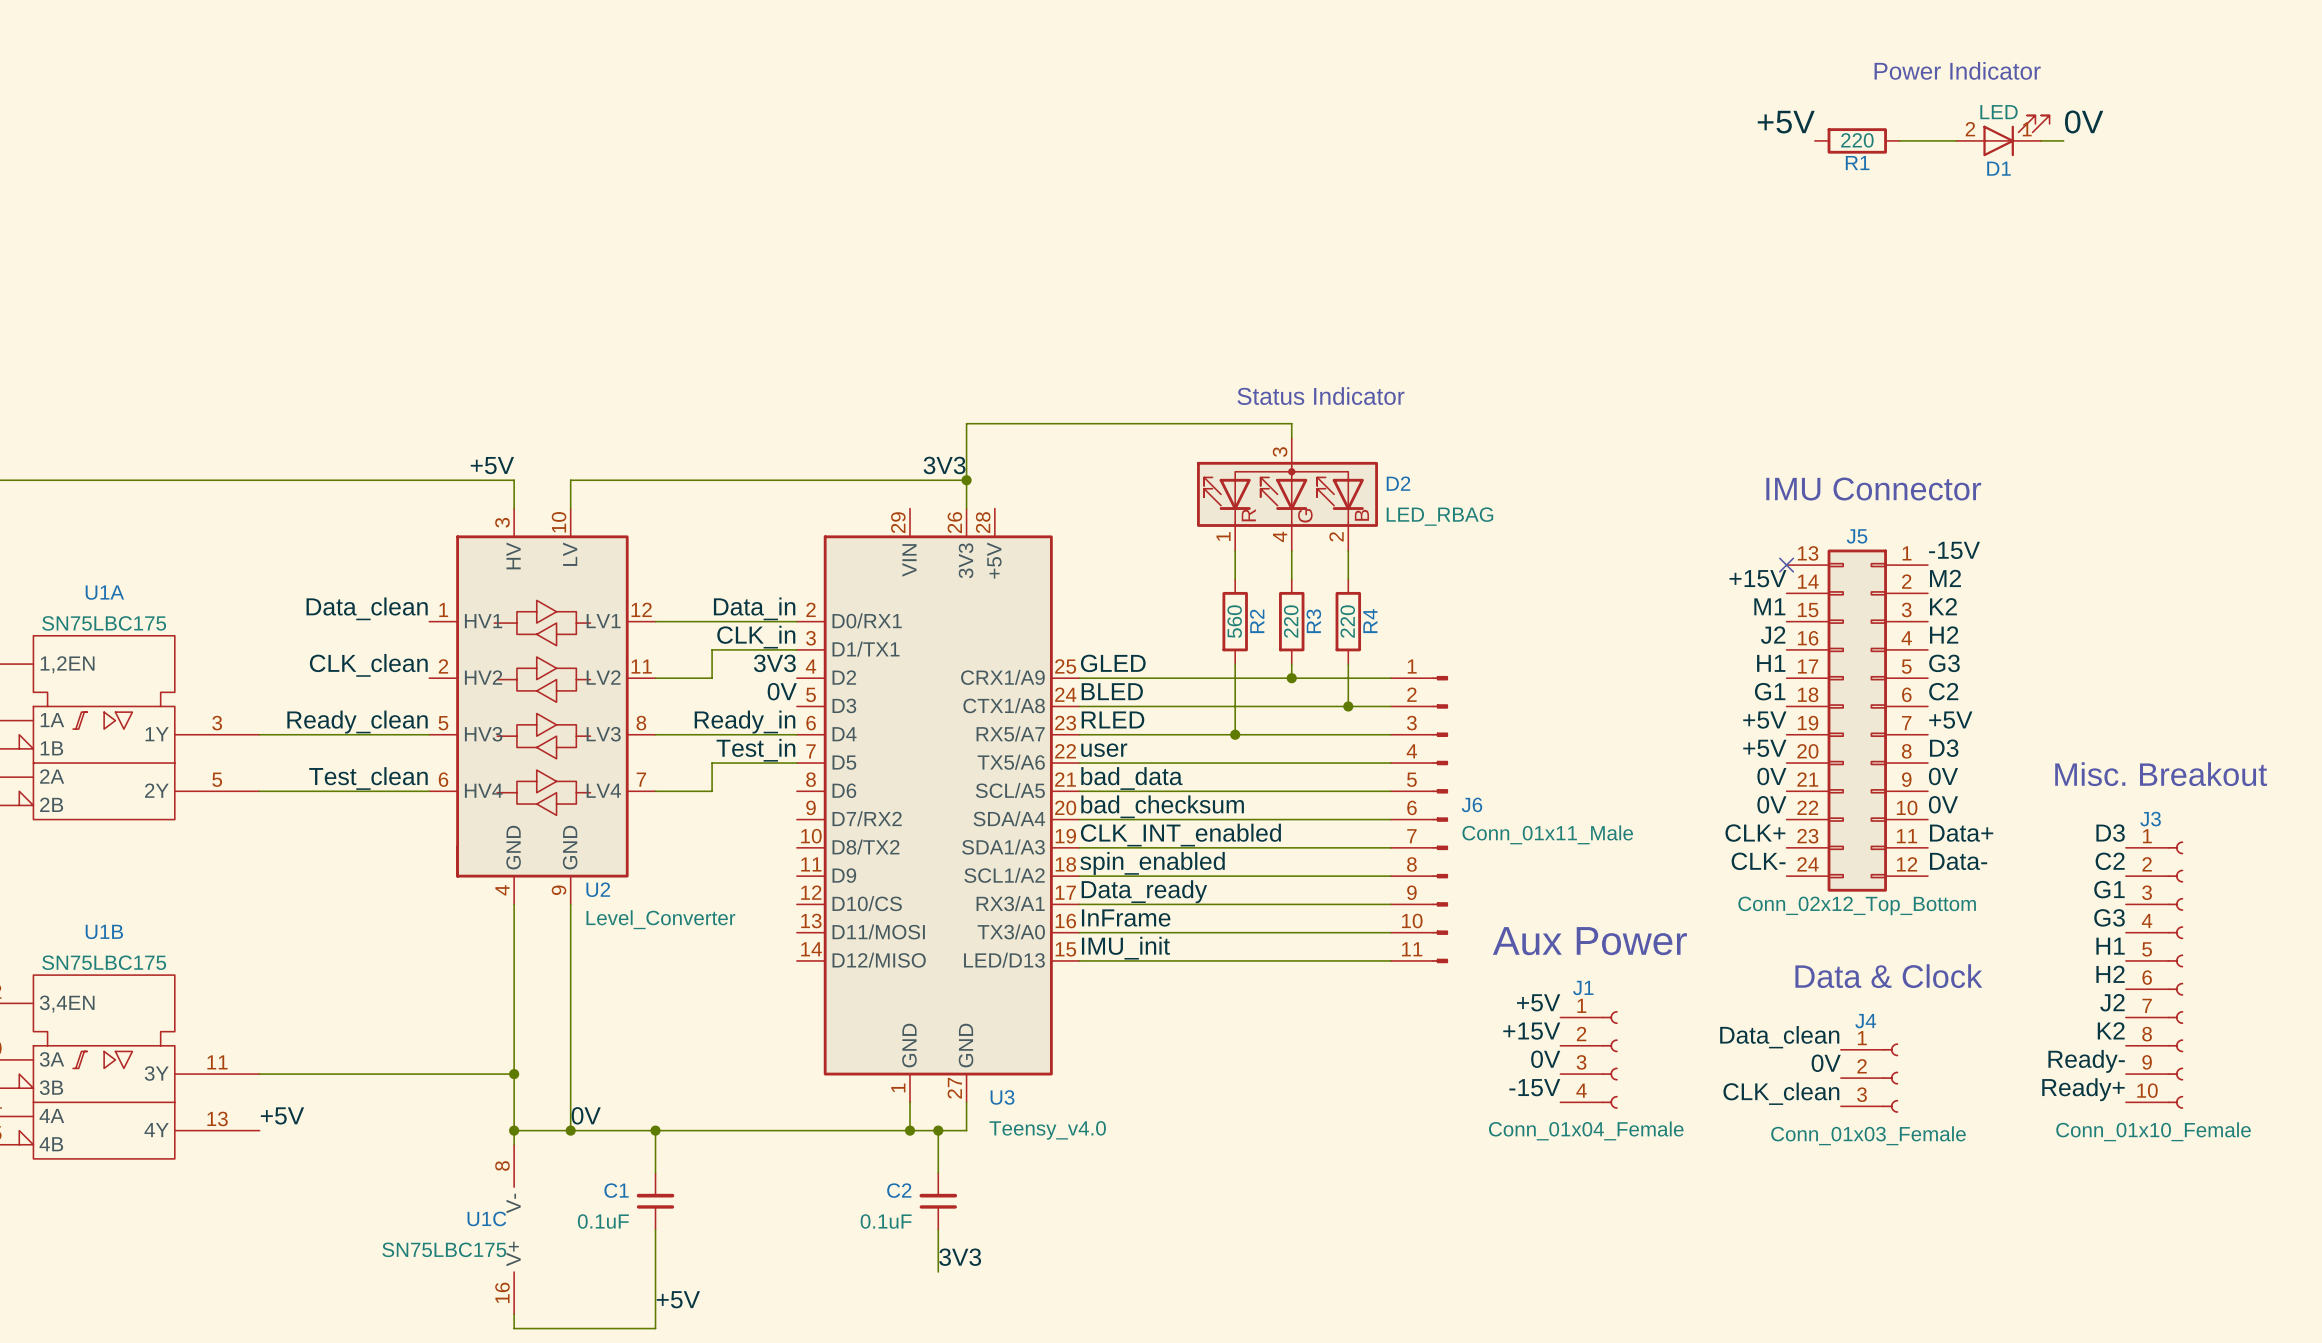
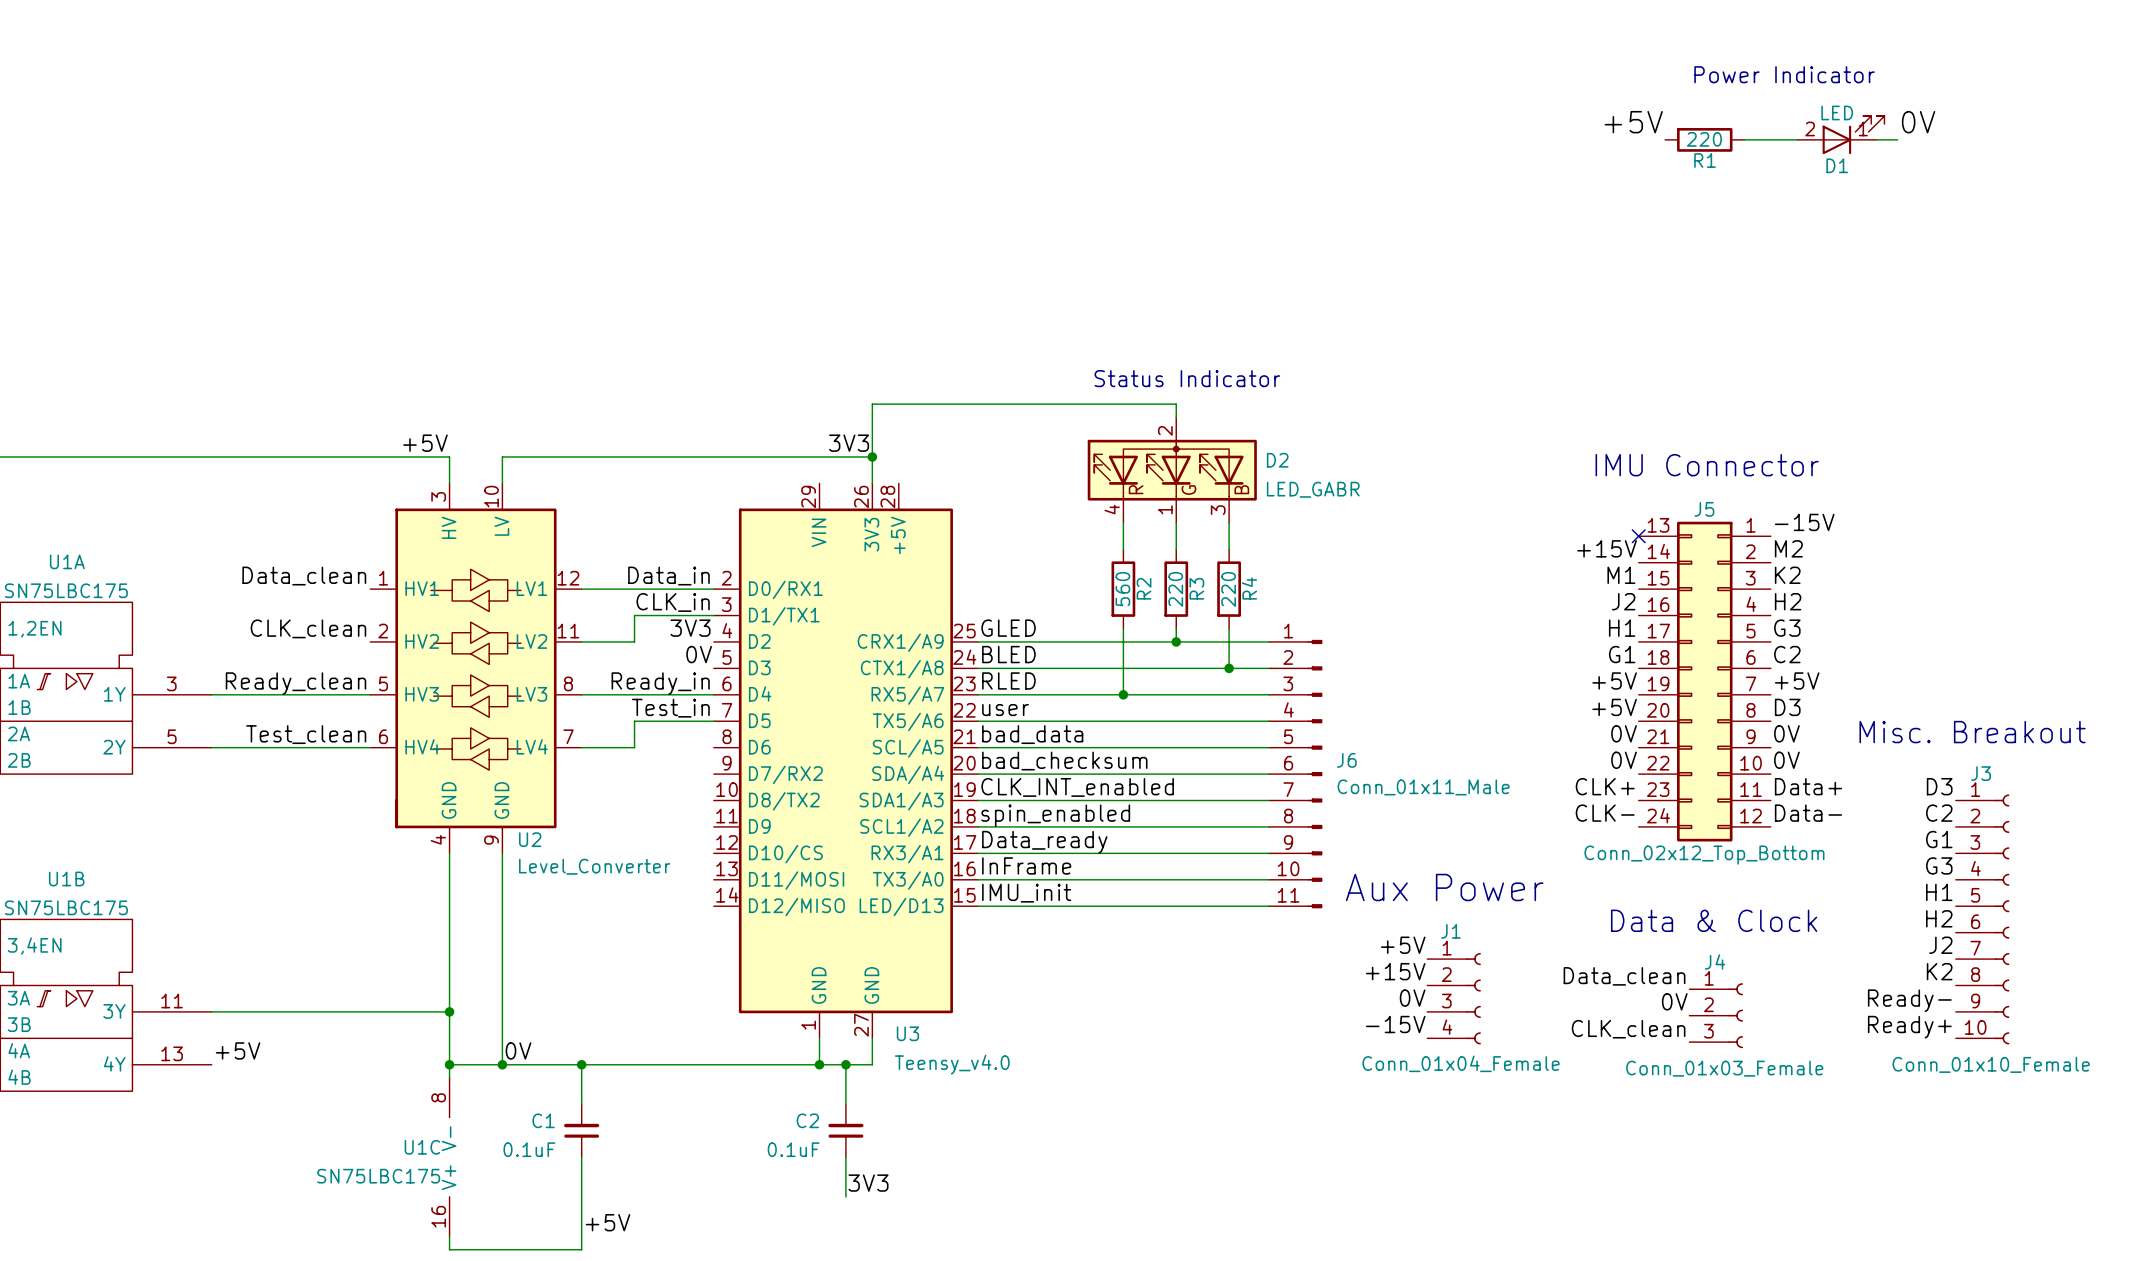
D2 pin number: 3 (1280, 452) -> 2 (1165, 430)
D2 value: LED_RBAG (1439, 516) -> LED_GABR (1313, 489)
D2 pin number: 1 (1223, 536) -> 4 (1112, 509)
D2 pin number: 4 (1280, 536) -> 1 (1165, 509)
D2 pin number: 2 (1336, 536) -> 3 (1218, 510)

